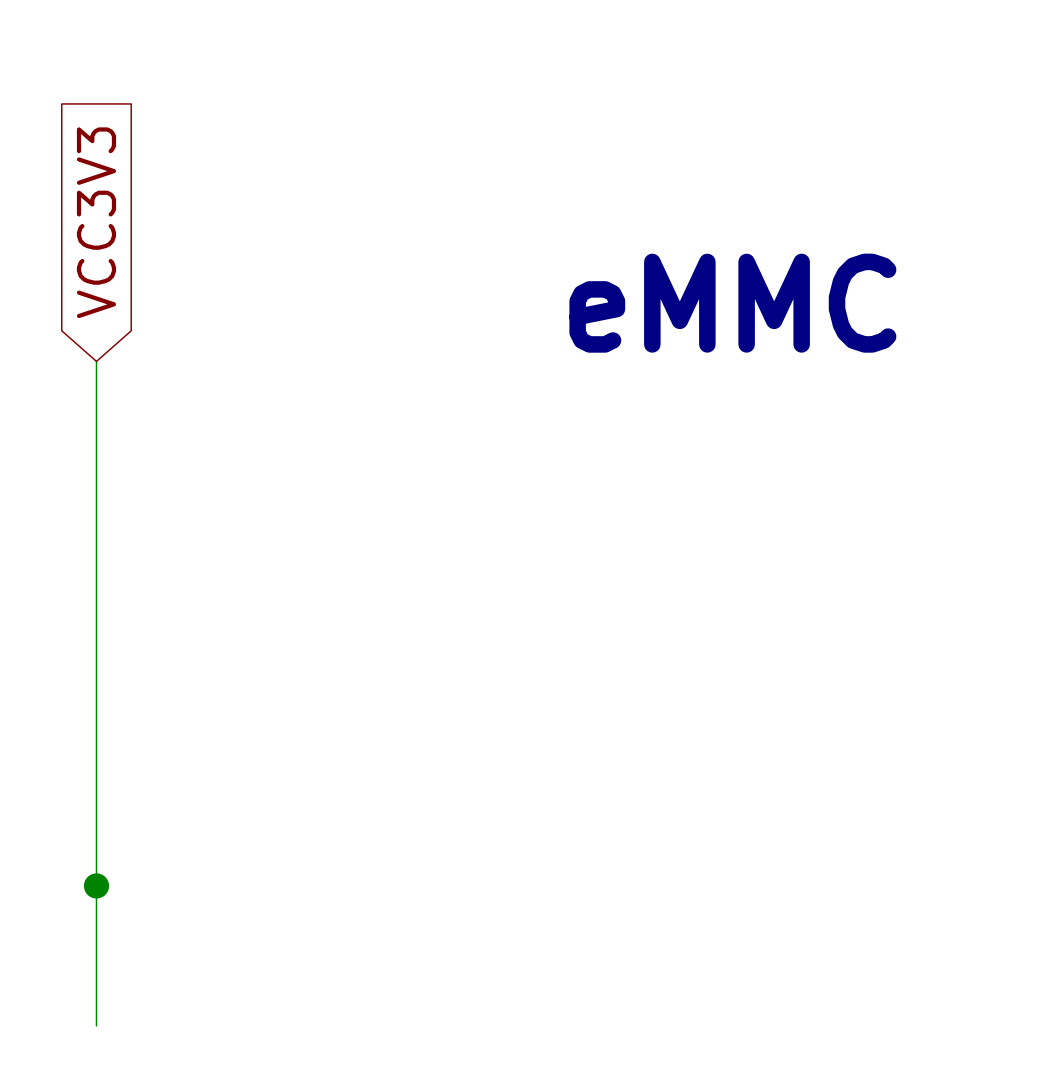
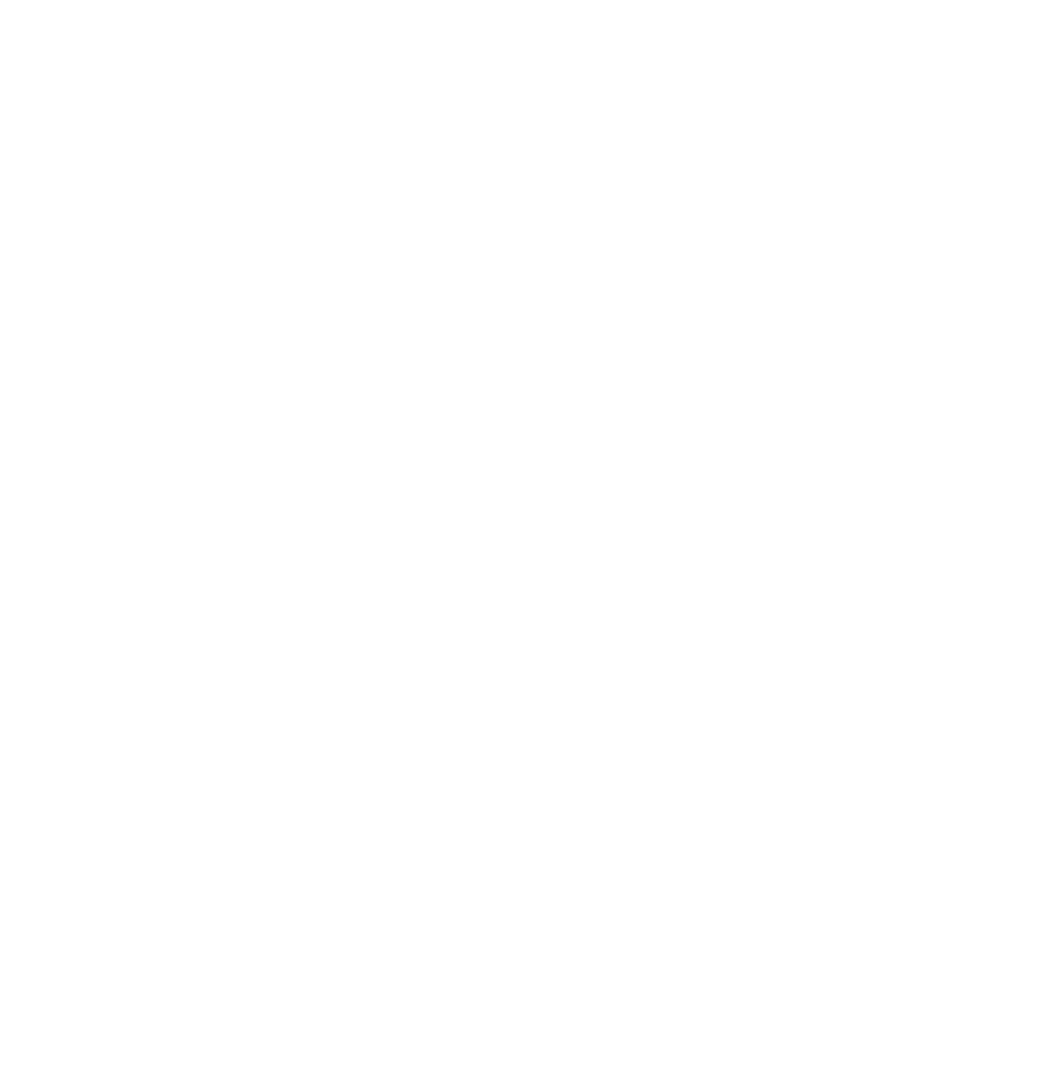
global label: VCC3V3 (96, 222) -> none
text: eMMC (732, 303) -> none
wire: (96, 361) (96, 1025) -> none
junction: (96, 885) -> none

